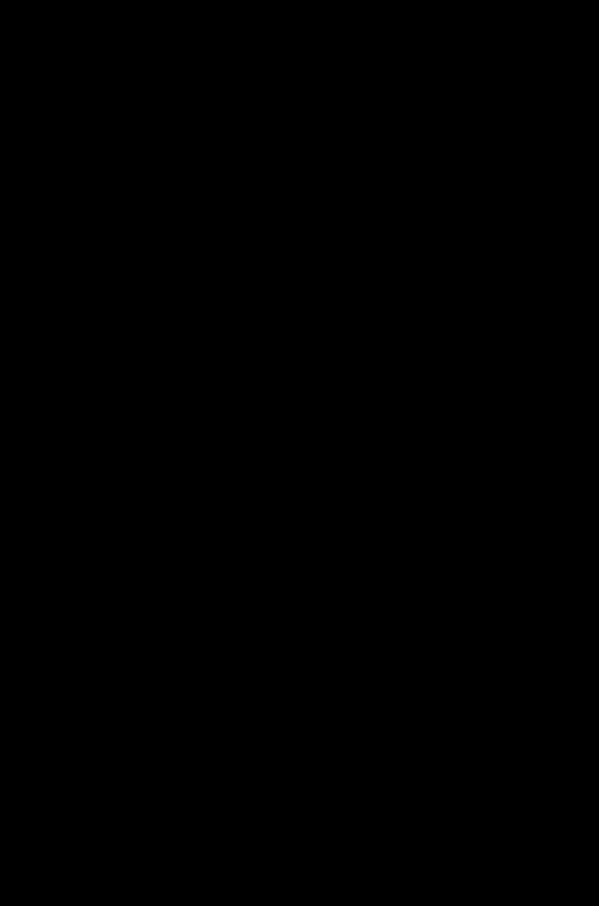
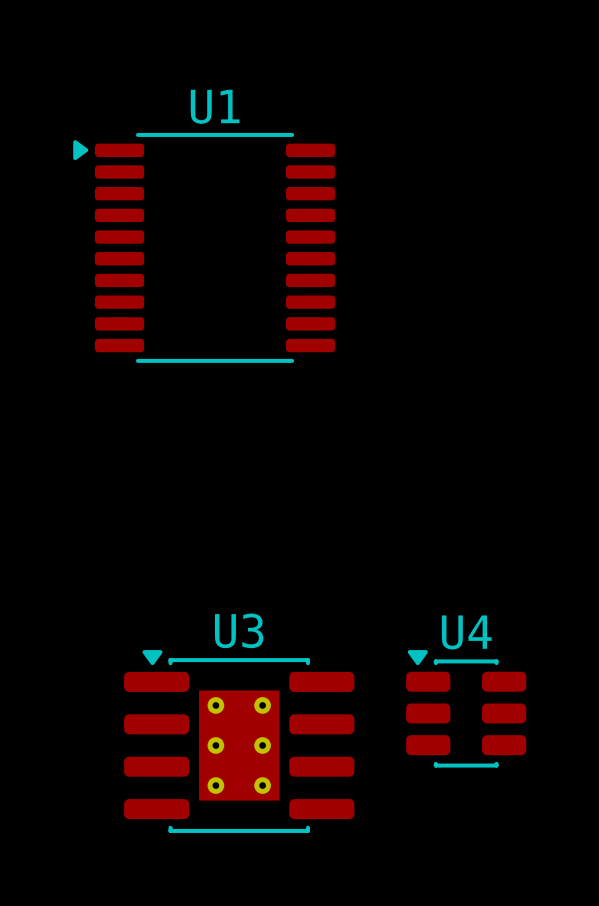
U1: none -> (204, 247)
U4: none -> (466, 708)
U3: none -> (239, 741)

